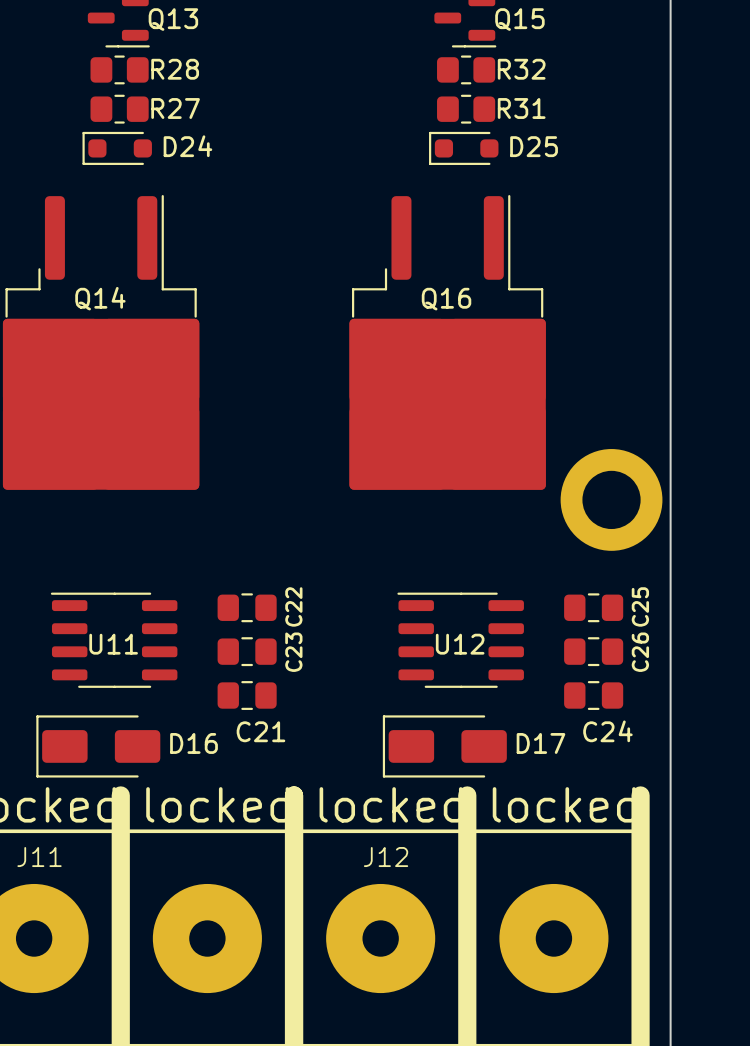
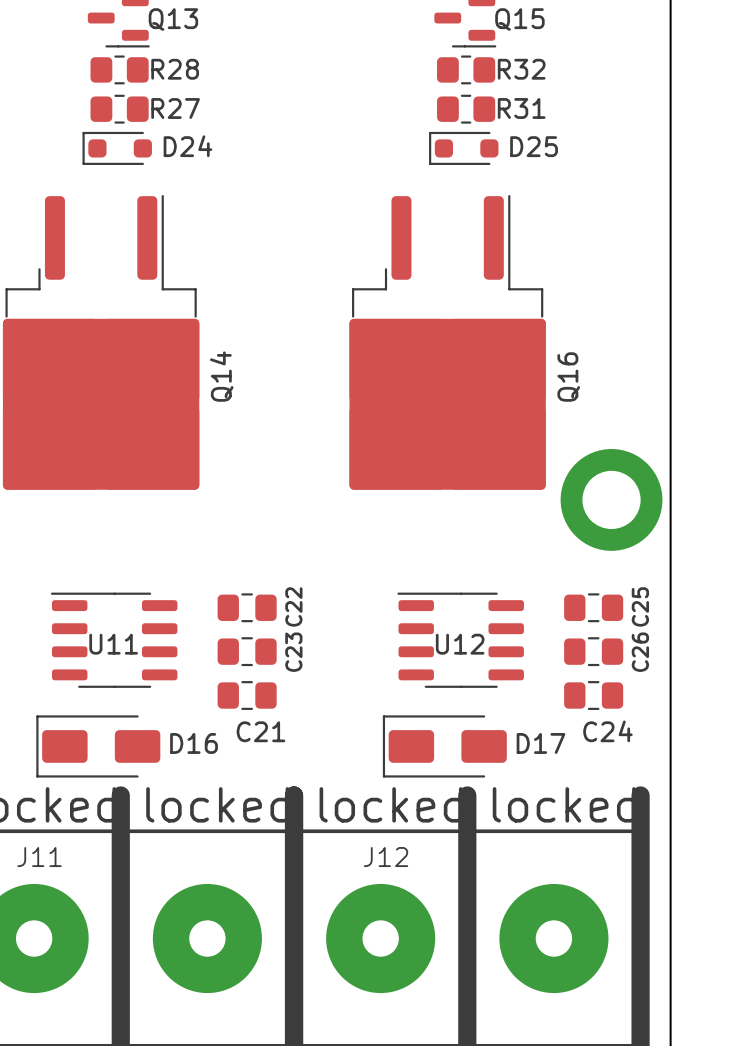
Q14 name rotation: 0° (100, 298) -> 90° counterclockwise (221, 376)
Q14 name position: Q14 (100, 298) -> Q14 (221, 376)
Q16 name rotation: 0° (446, 299) -> 90° counterclockwise (568, 377)
Q16 name position: Q16 (446, 299) -> Q16 (568, 377)

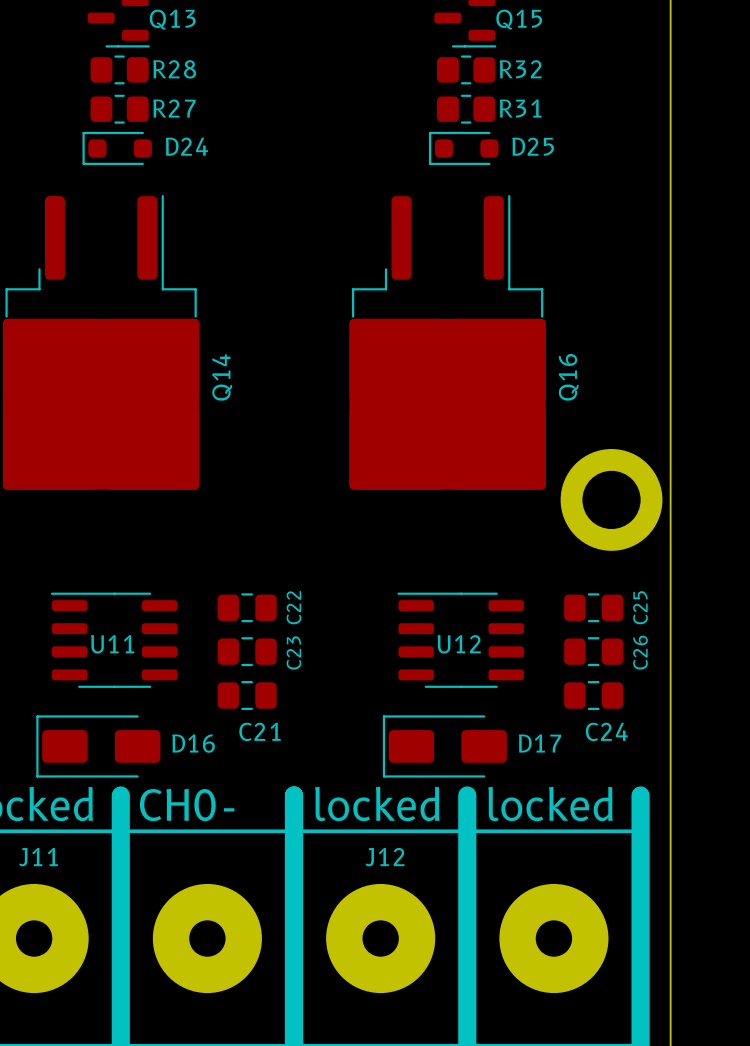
text: locked (217, 804) -> CH0- (187, 805)

